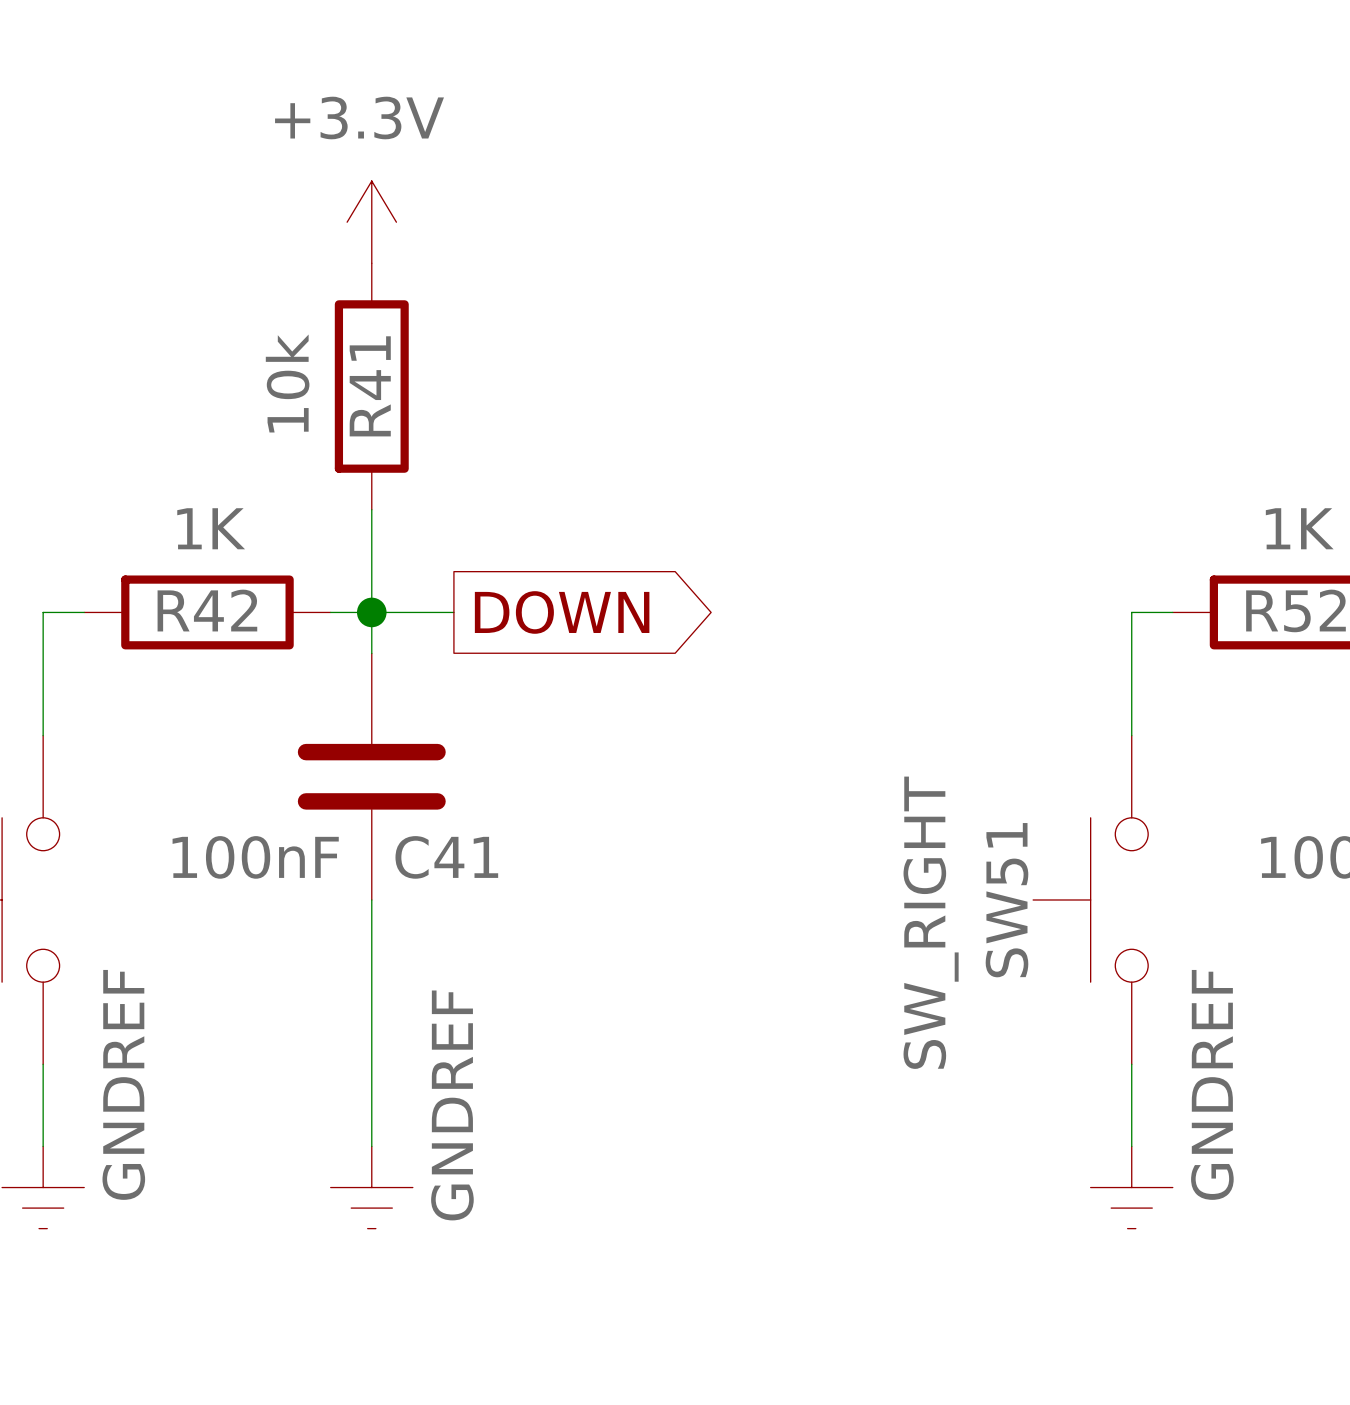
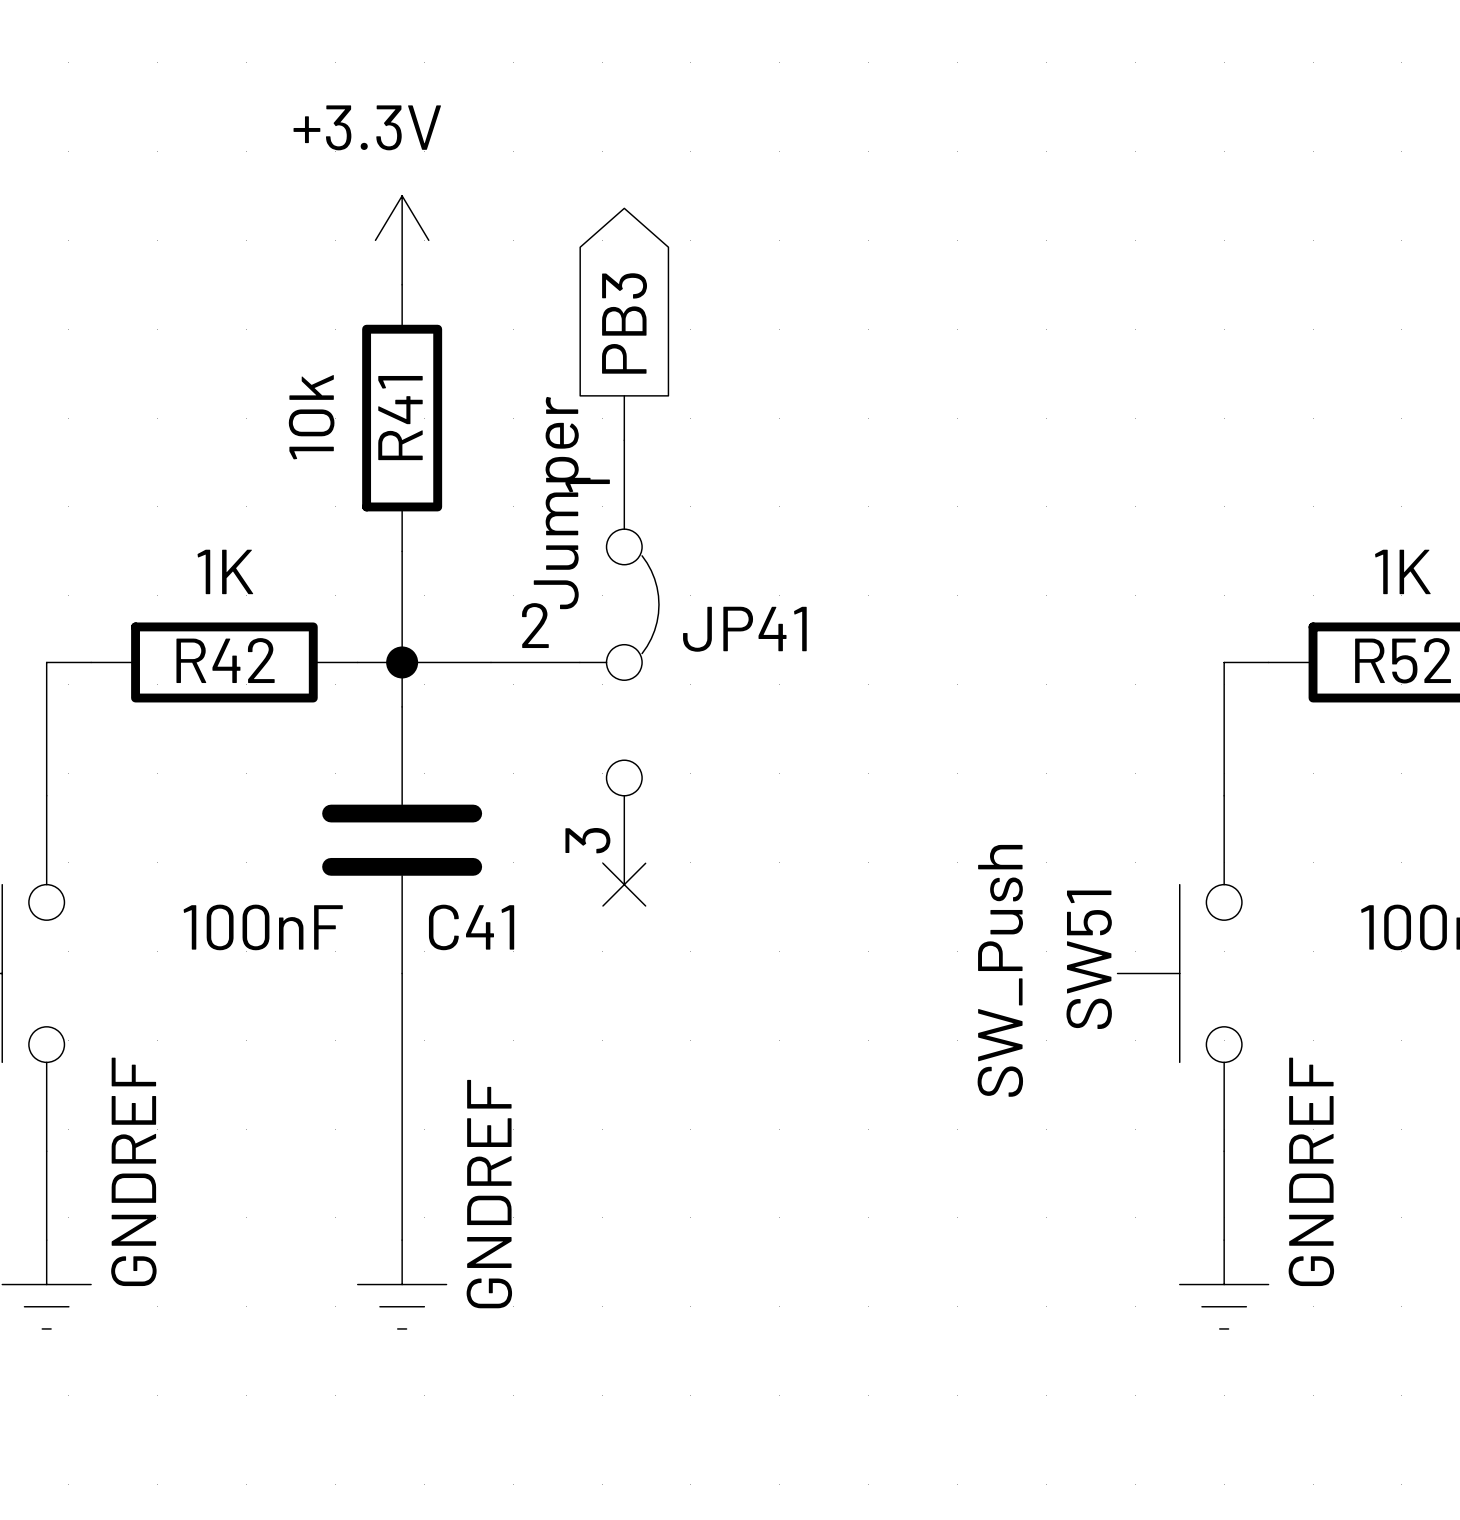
global label: none -> PB3 (624, 323)
wire: none -> (624, 395) (624, 440)
JP41: none -> Jumper (575, 662)
global label: DOWN (562, 612) -> none
no-connect mark: none -> (624, 884)
SW51 value: SW_RIGHT (931, 922) -> SW_Push (1000, 970)

